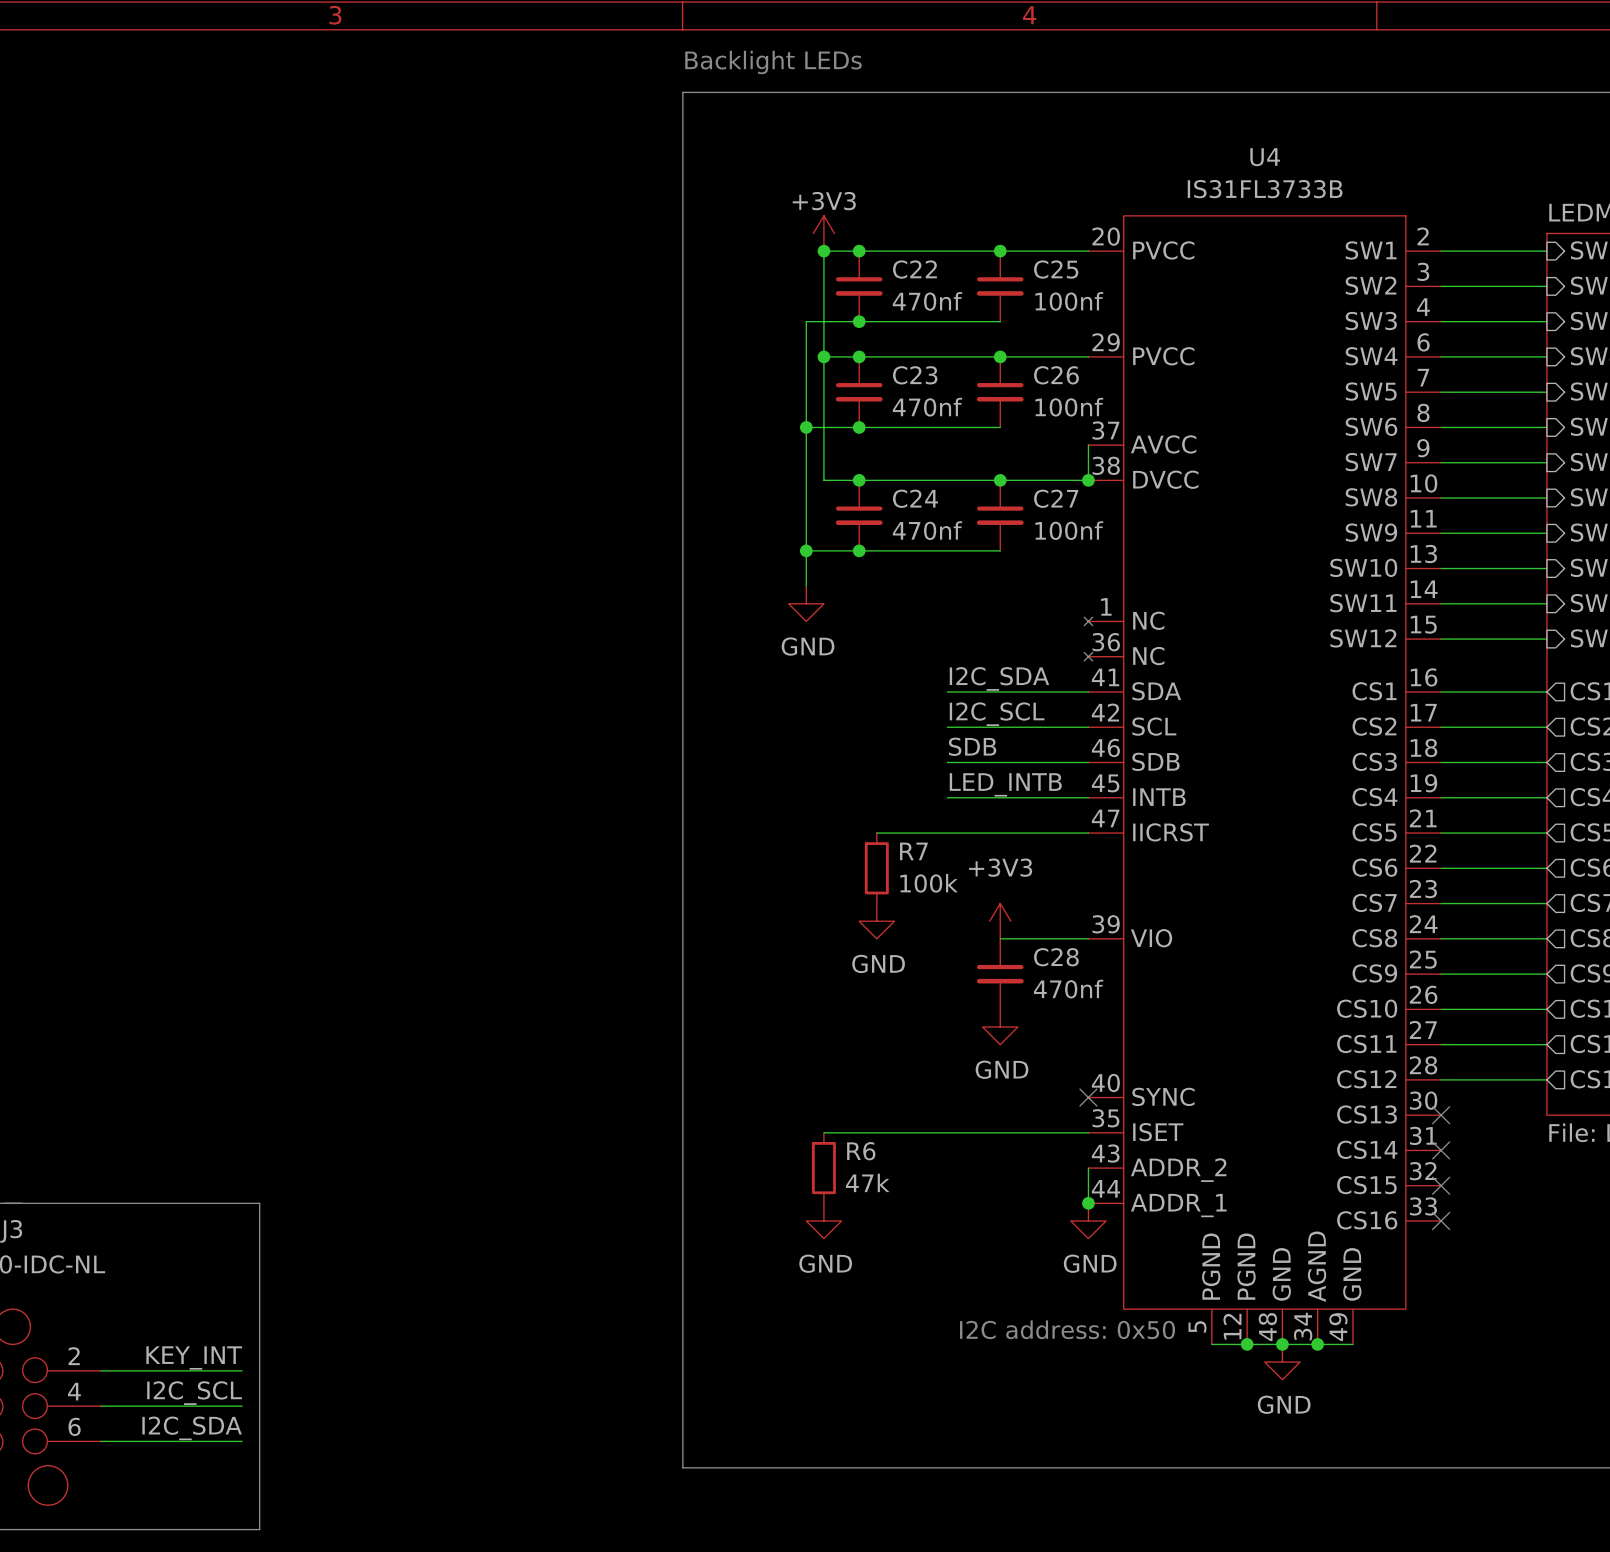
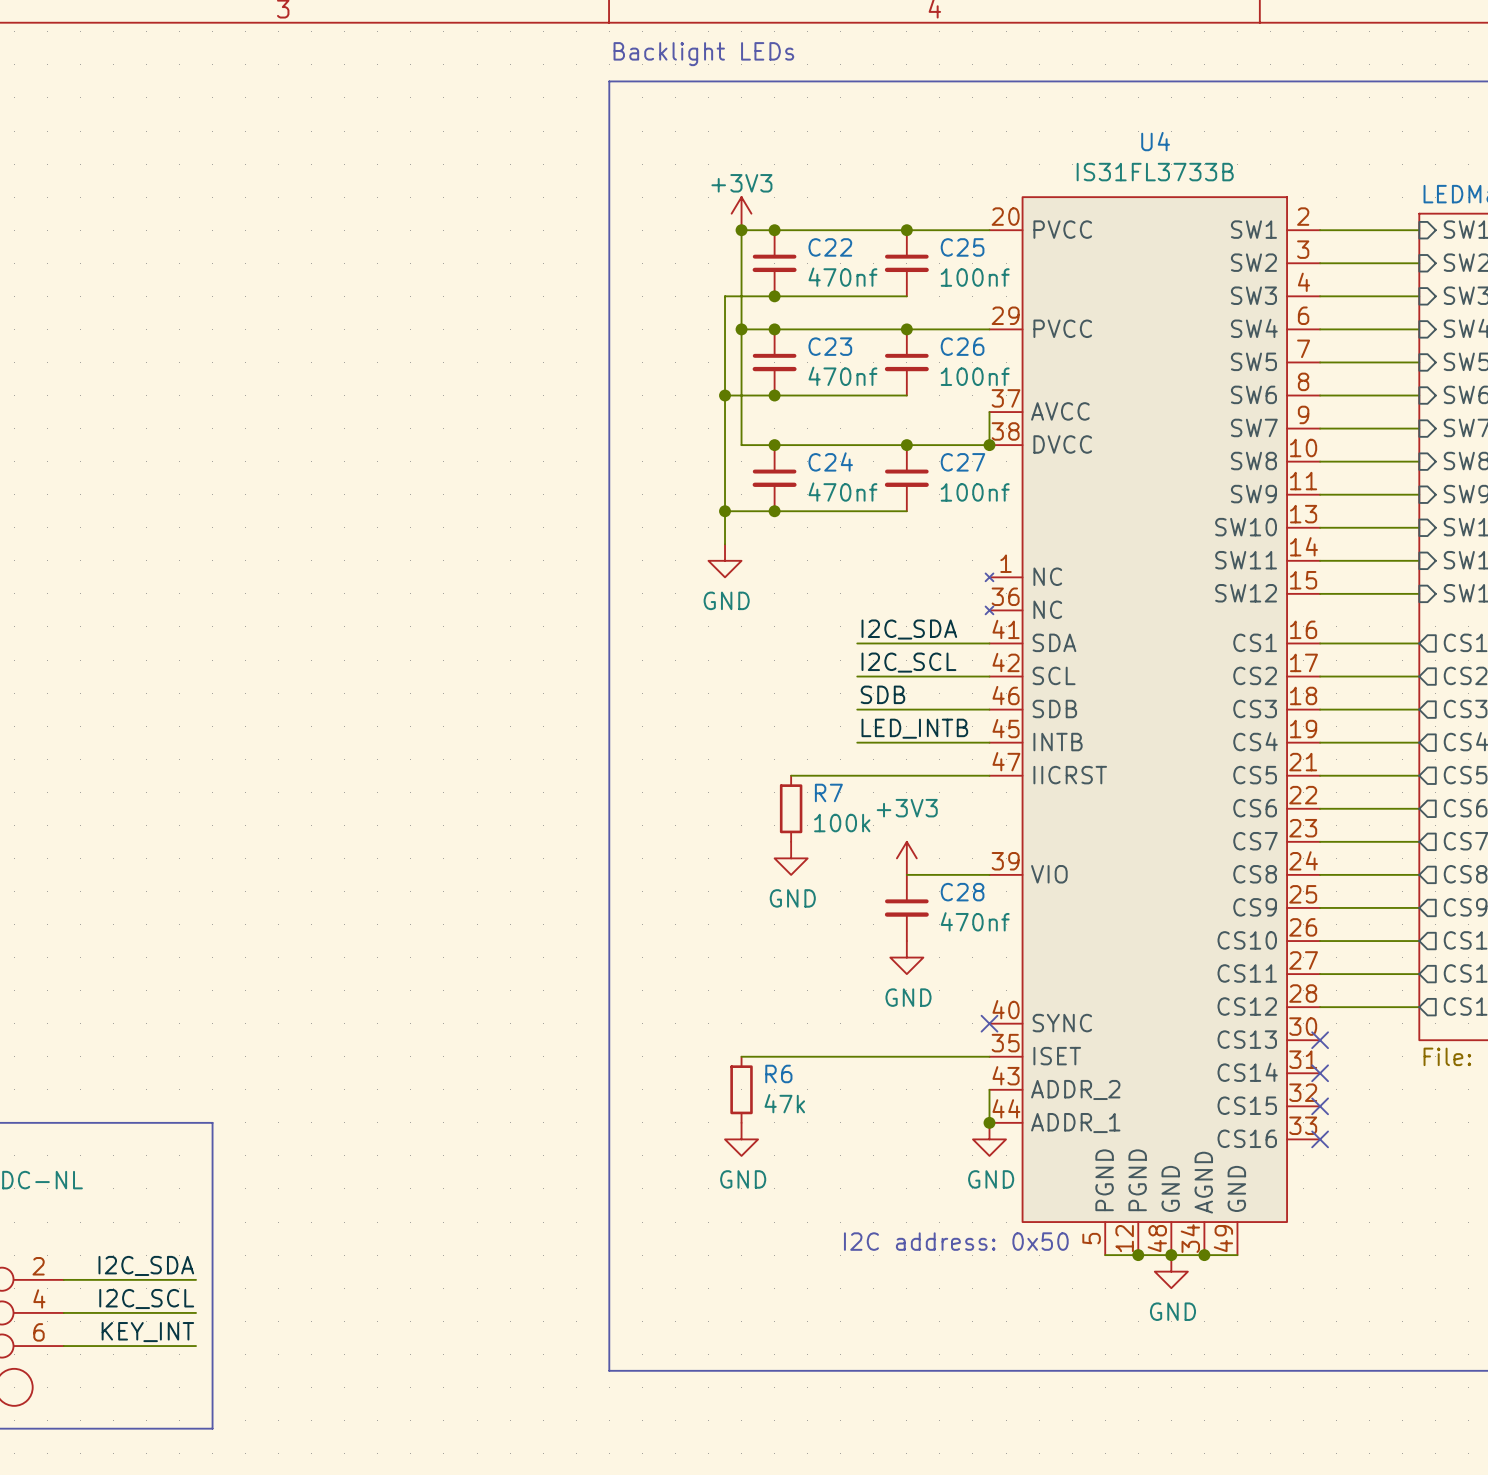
label: KEY_INT (194, 1357) -> I2C_SDA (146, 1265)
label: I2C_SDA (192, 1428) -> KEY_INT (147, 1332)

